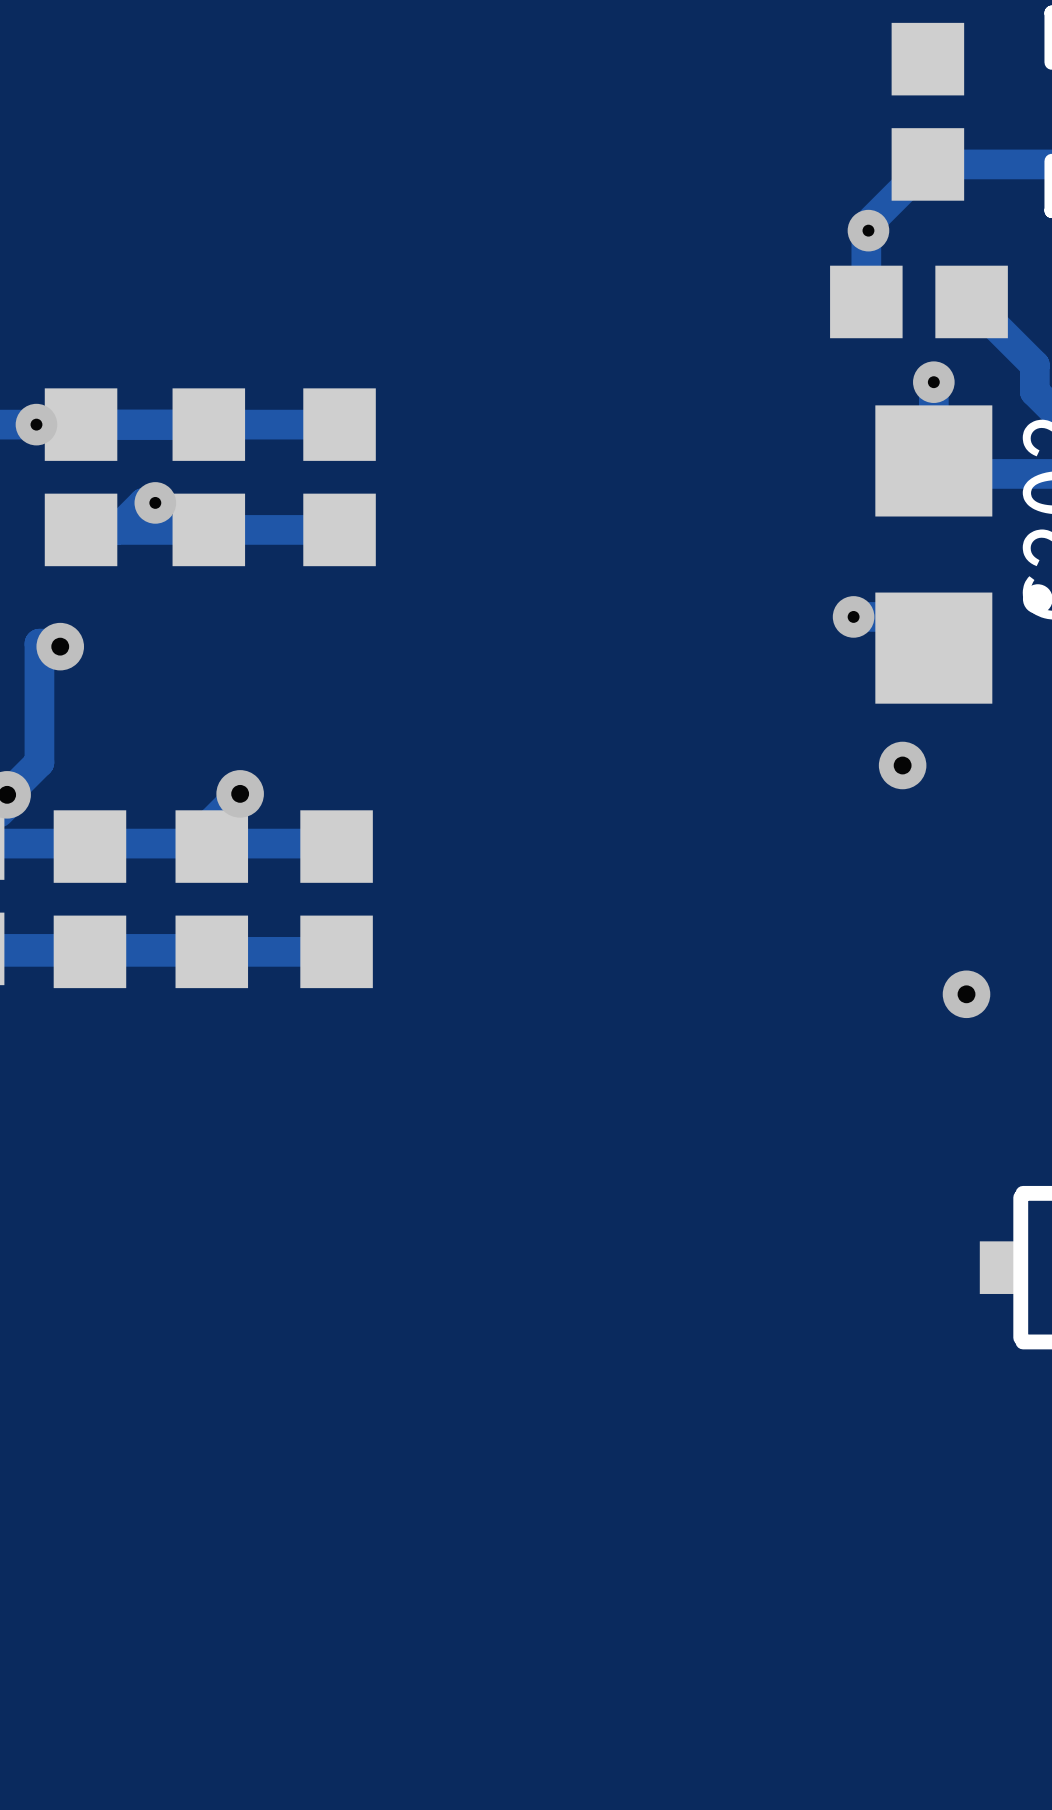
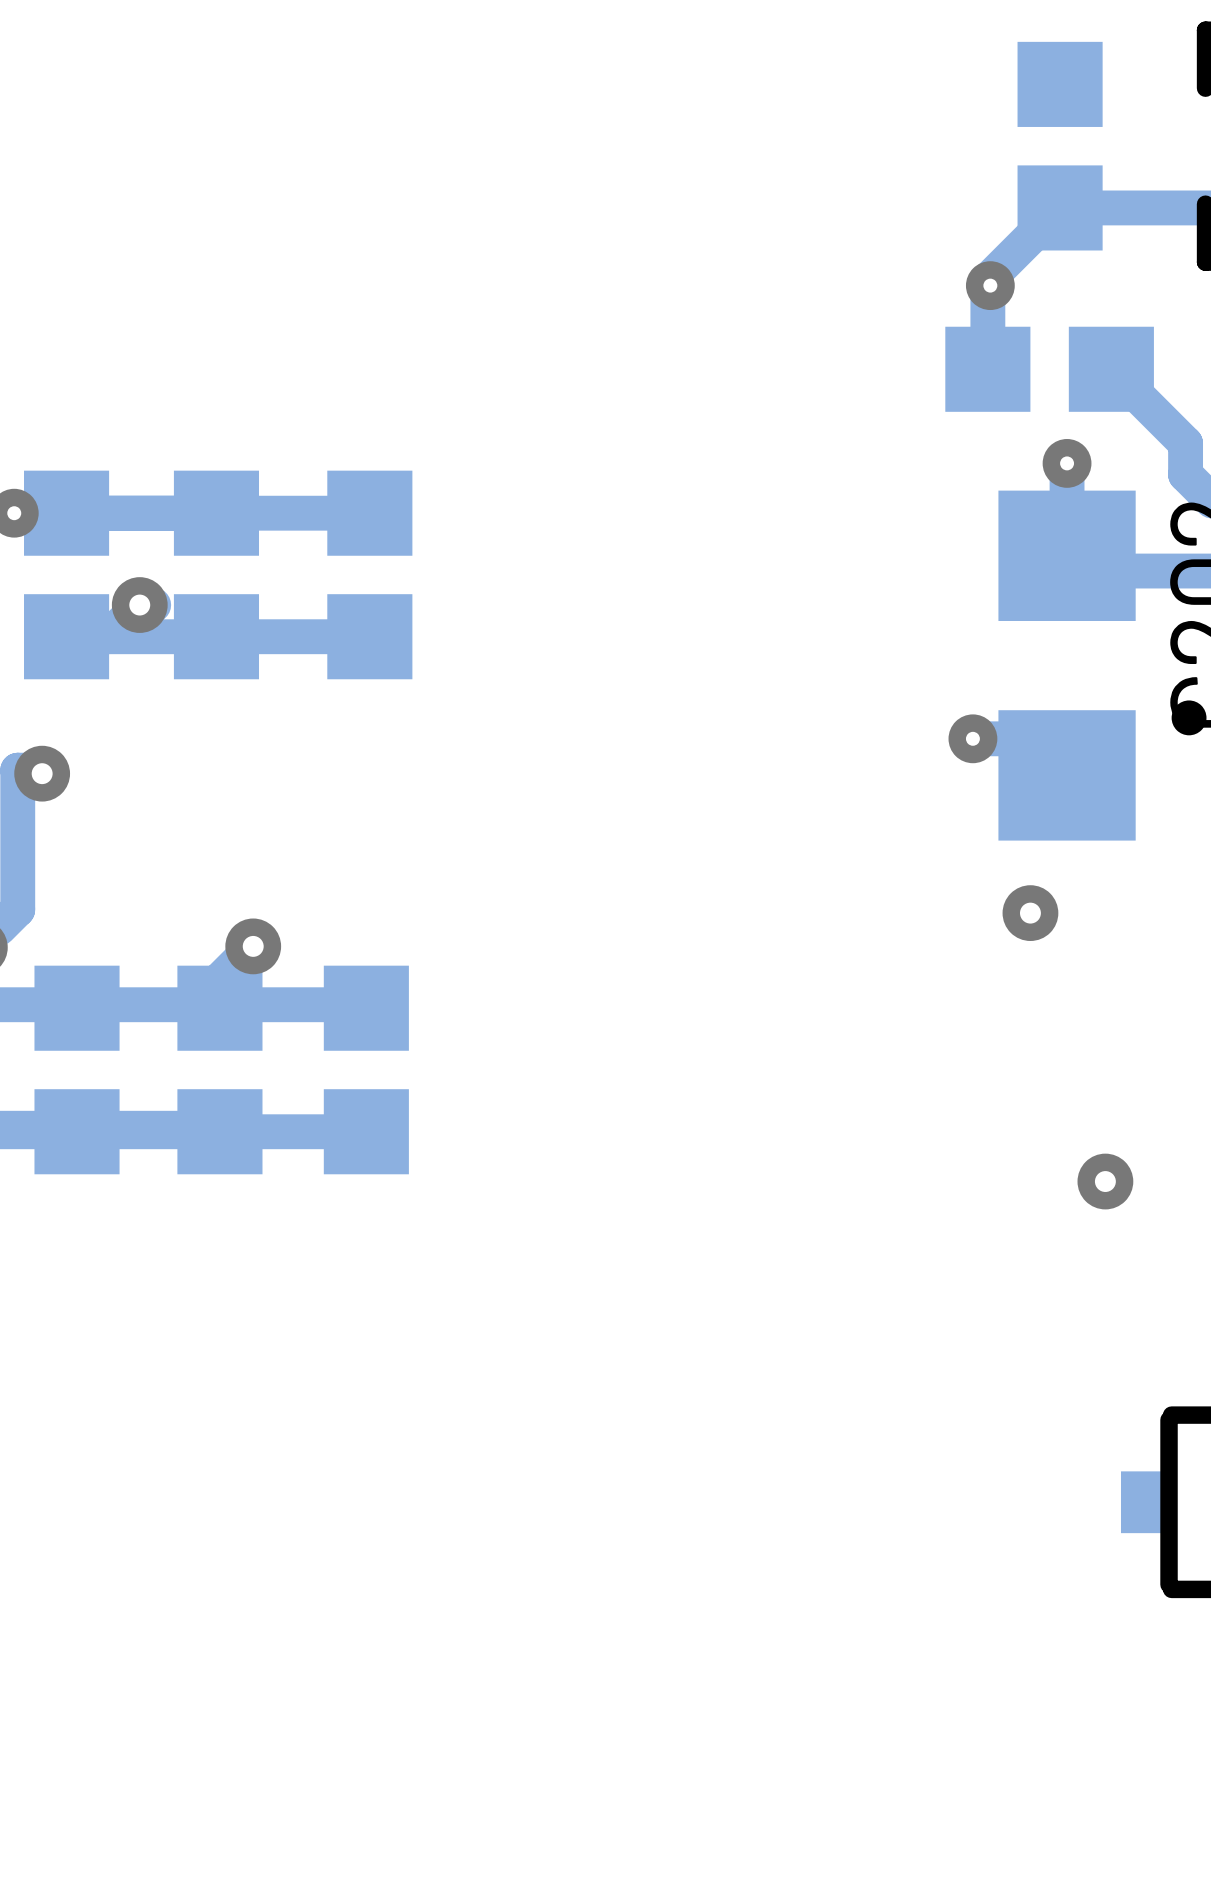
via size: [134, 482, 177, 524] -> [111, 577, 168, 633]

